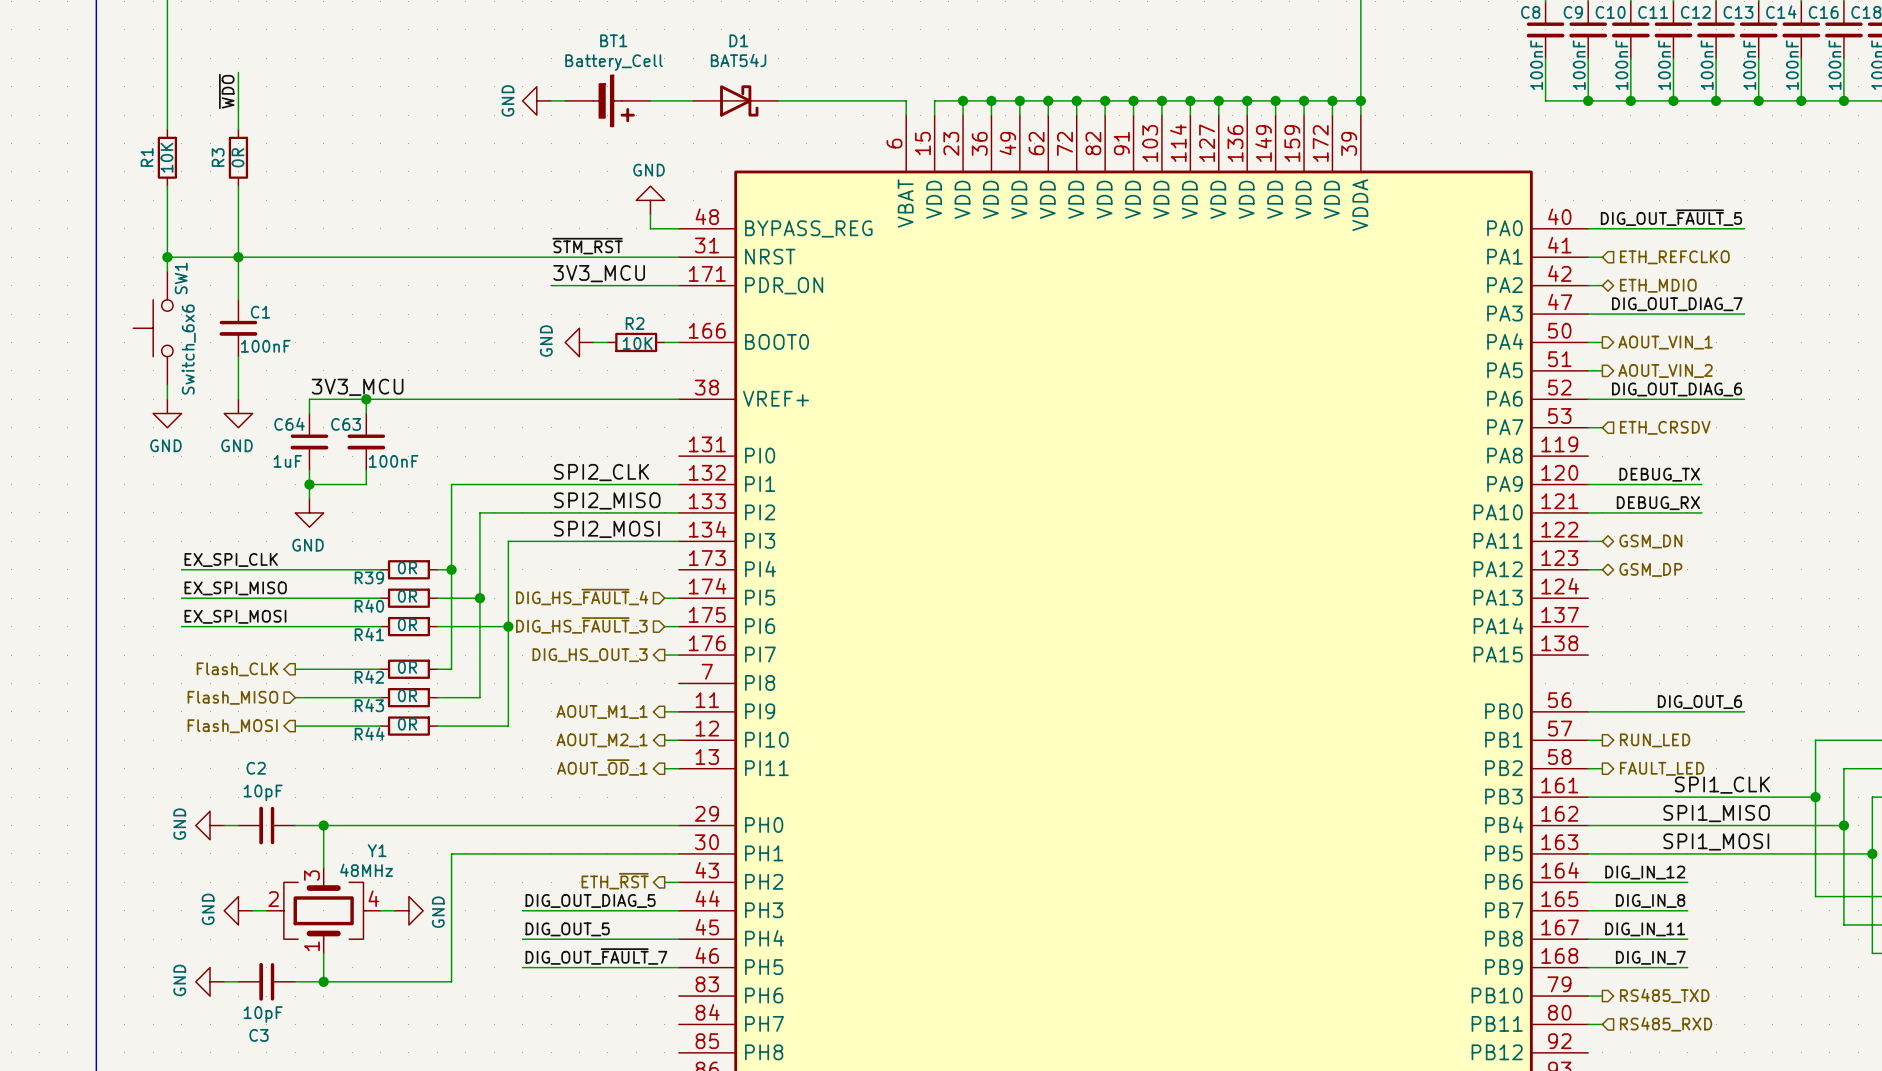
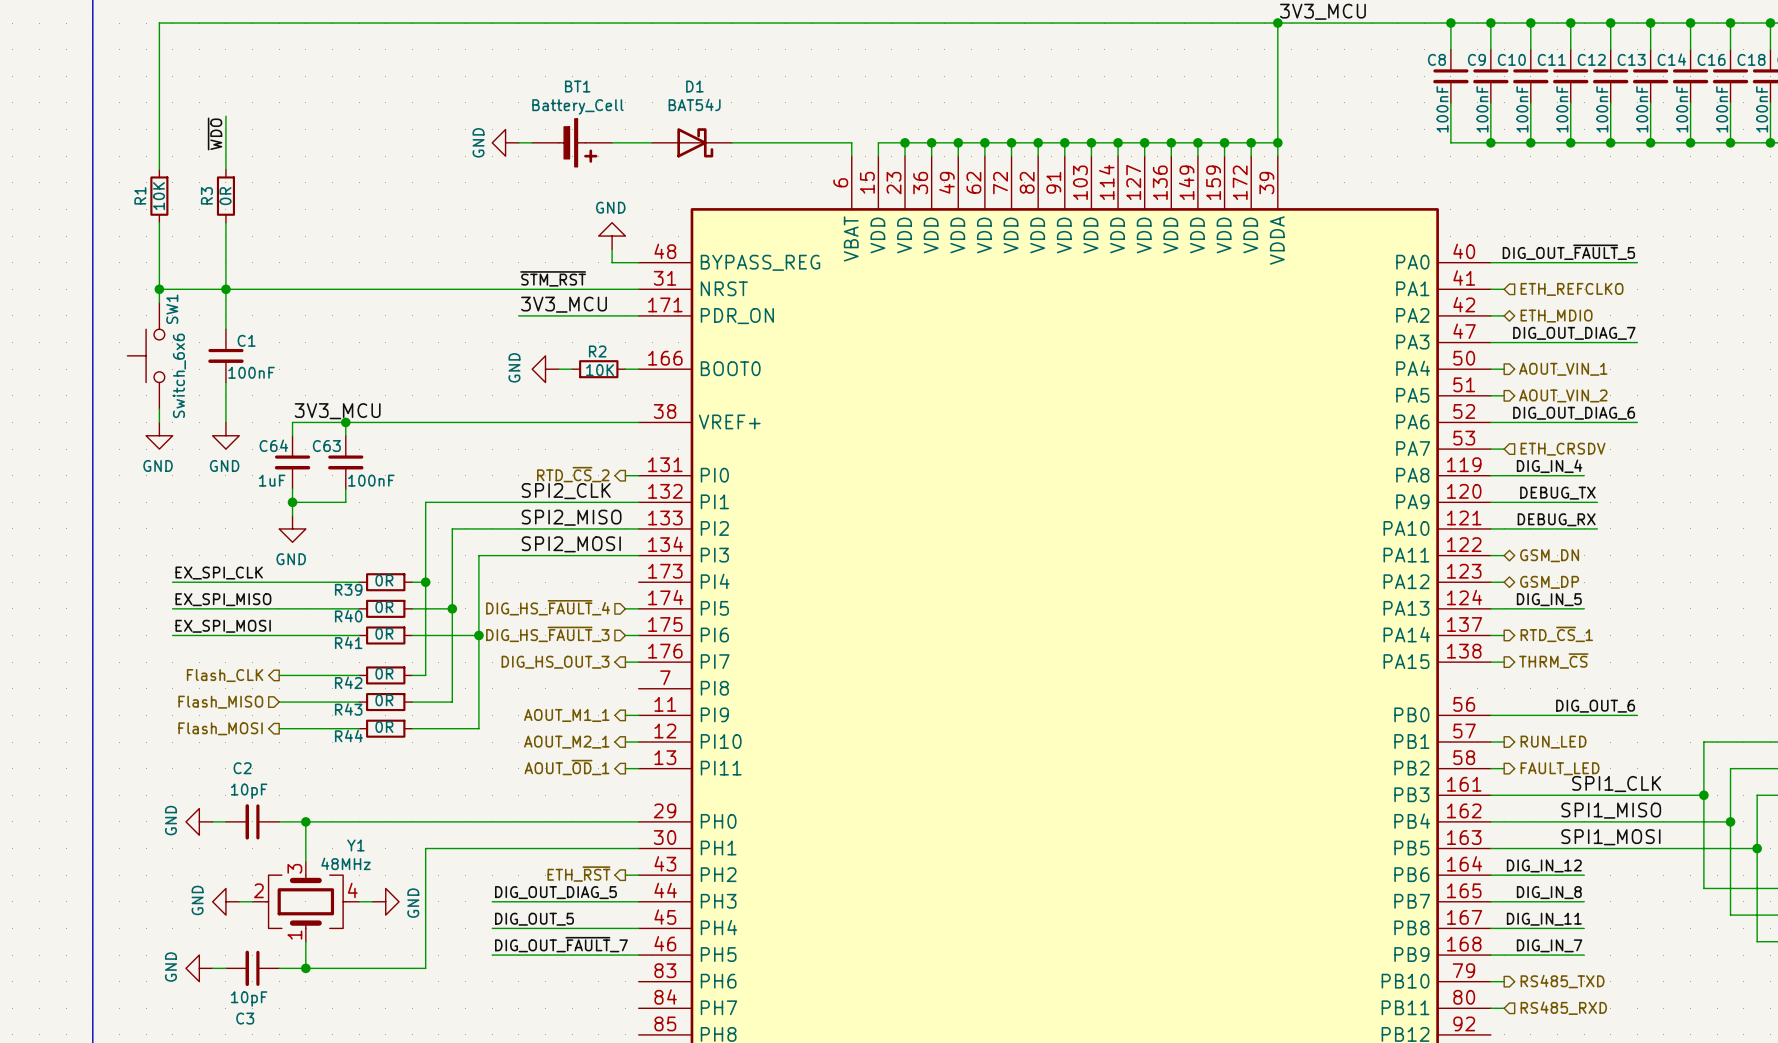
label: none -> DIG_IN_4 (1549, 466)
hierarchical label: none -> RTD_~{CS}_2 (573, 474)
wire: none -> (625, 475) (638, 475)
wire: none -> (1490, 475) (1584, 475)
label: none -> DIG_IN_5 (1549, 599)
wire: none -> (1490, 608) (1584, 608)
hierarchical label: none -> RTD_~{CS}_1 (1556, 634)
wire: none -> (1490, 635) (1504, 635)
hierarchical label: none -> THRM_~{CS} (1553, 661)
wire: none -> (1490, 662) (1504, 662)

